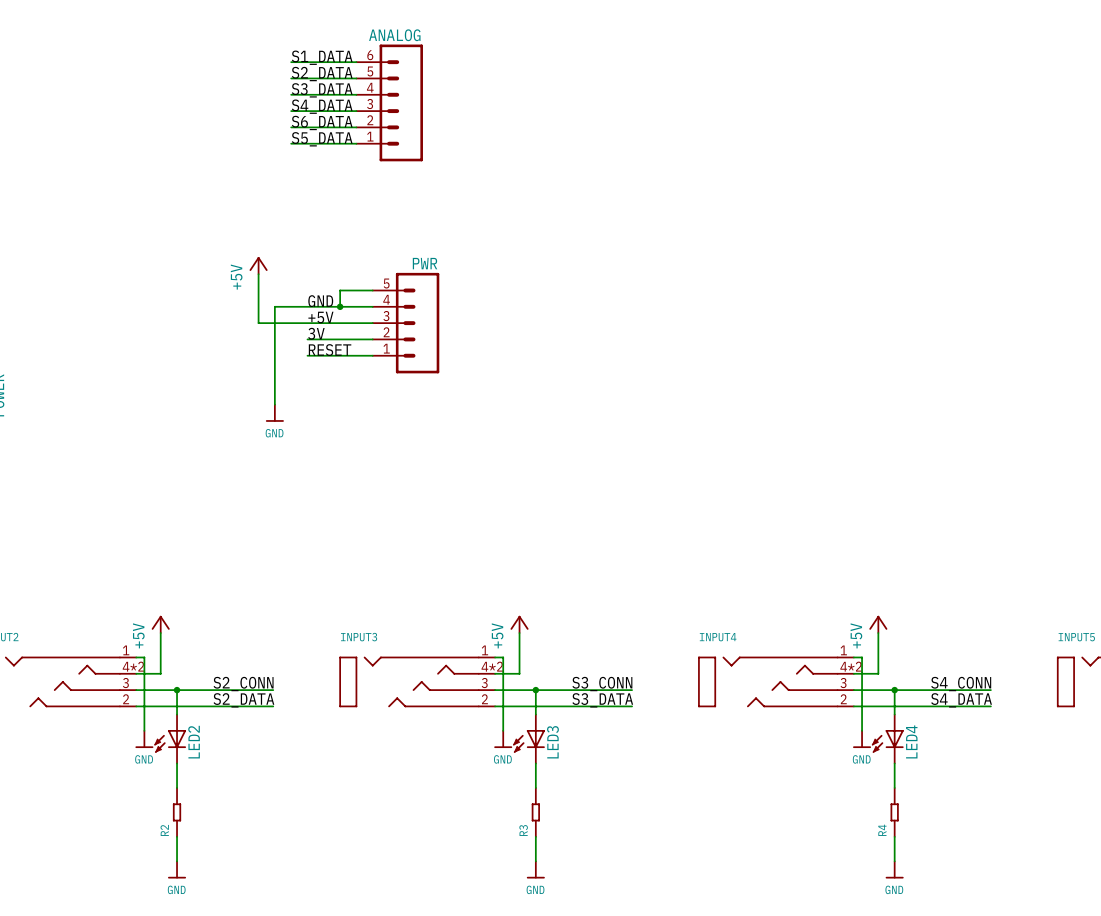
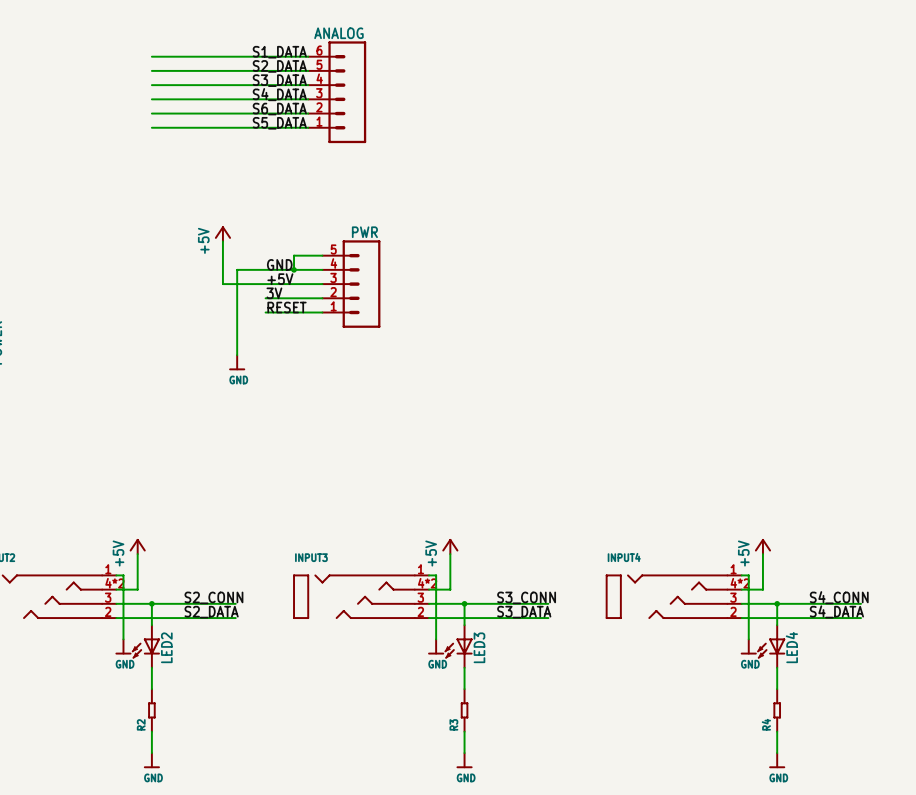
wire: none -> (151, 56) (251, 56)
wire: none -> (151, 70) (251, 70)
wire: none -> (151, 85) (251, 85)
wire: none -> (151, 99) (251, 99)
wire: none -> (151, 113) (251, 113)
wire: none -> (151, 127) (251, 127)

